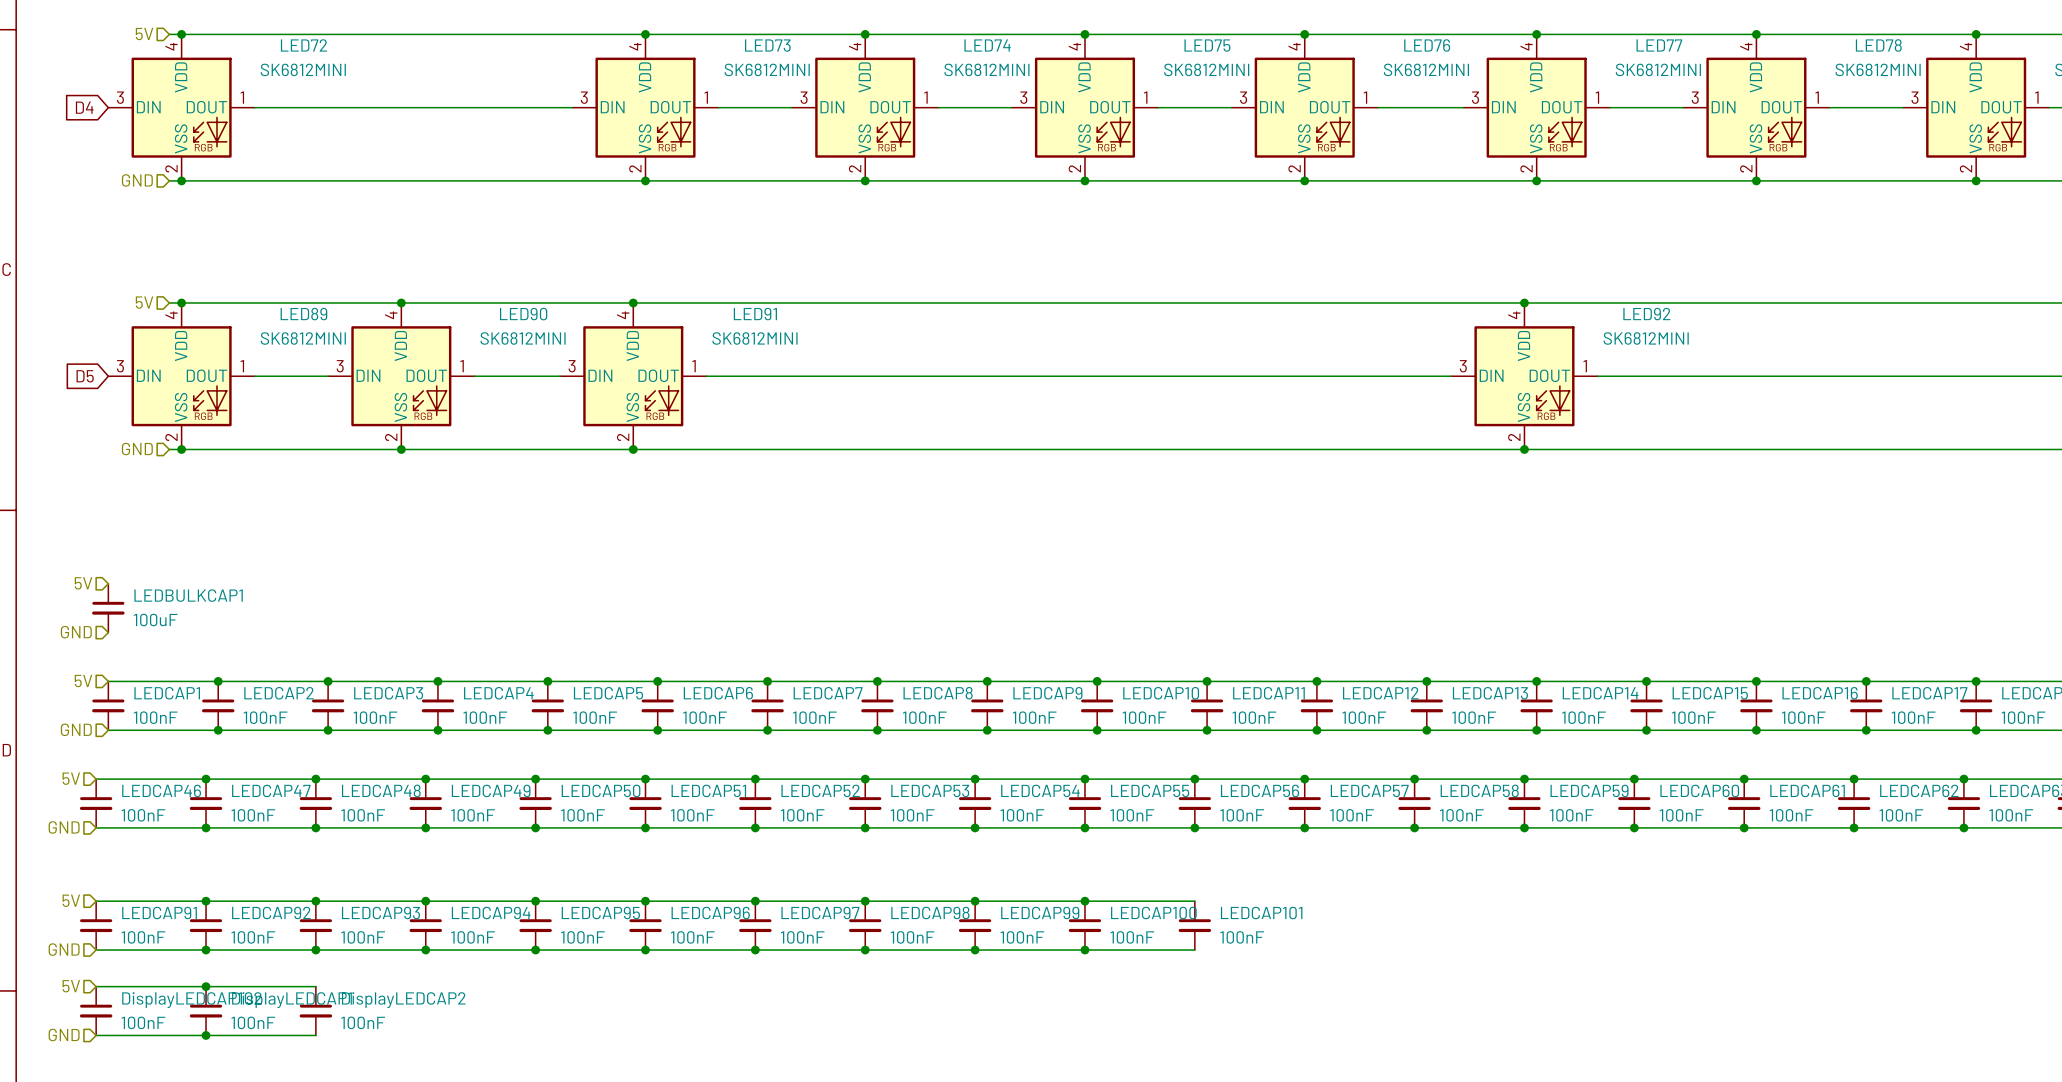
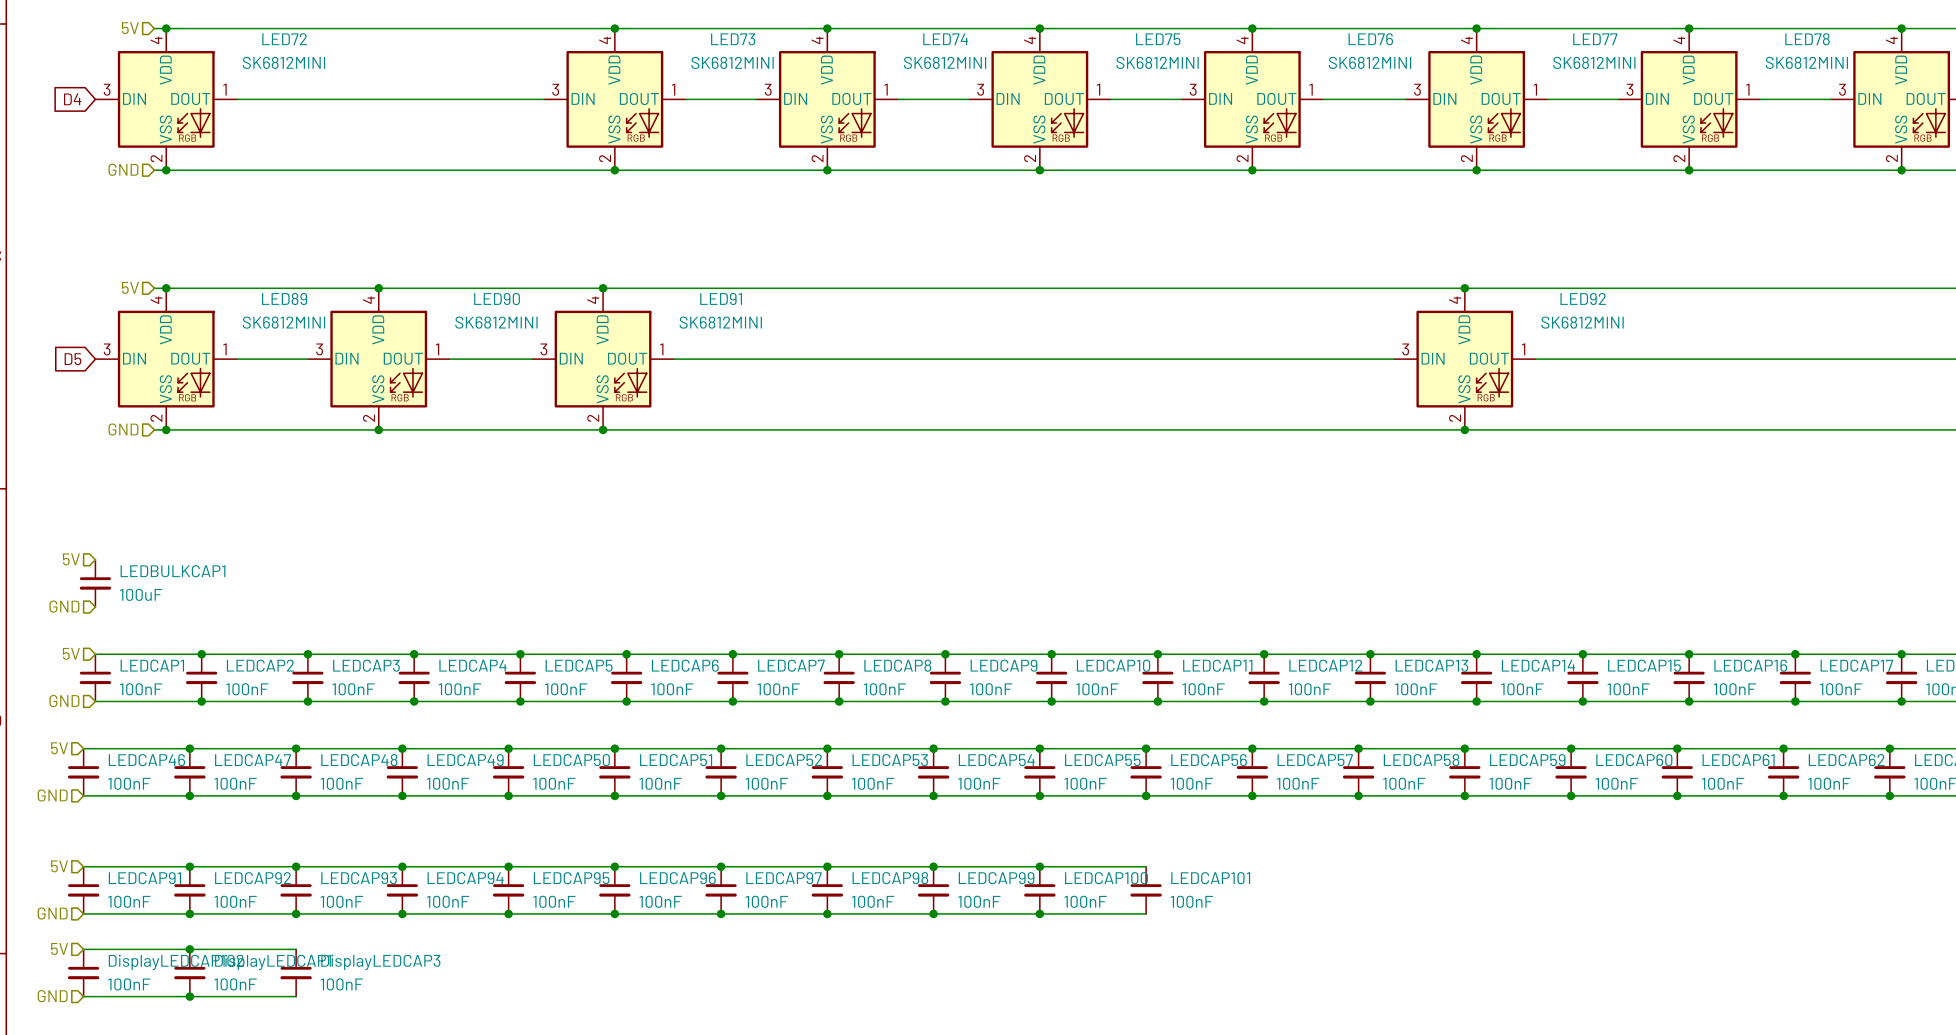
DisplayLEDCAP2 name: DisplayLEDCAP2 (403, 1000) -> DisplayLEDCAP3 (380, 962)

